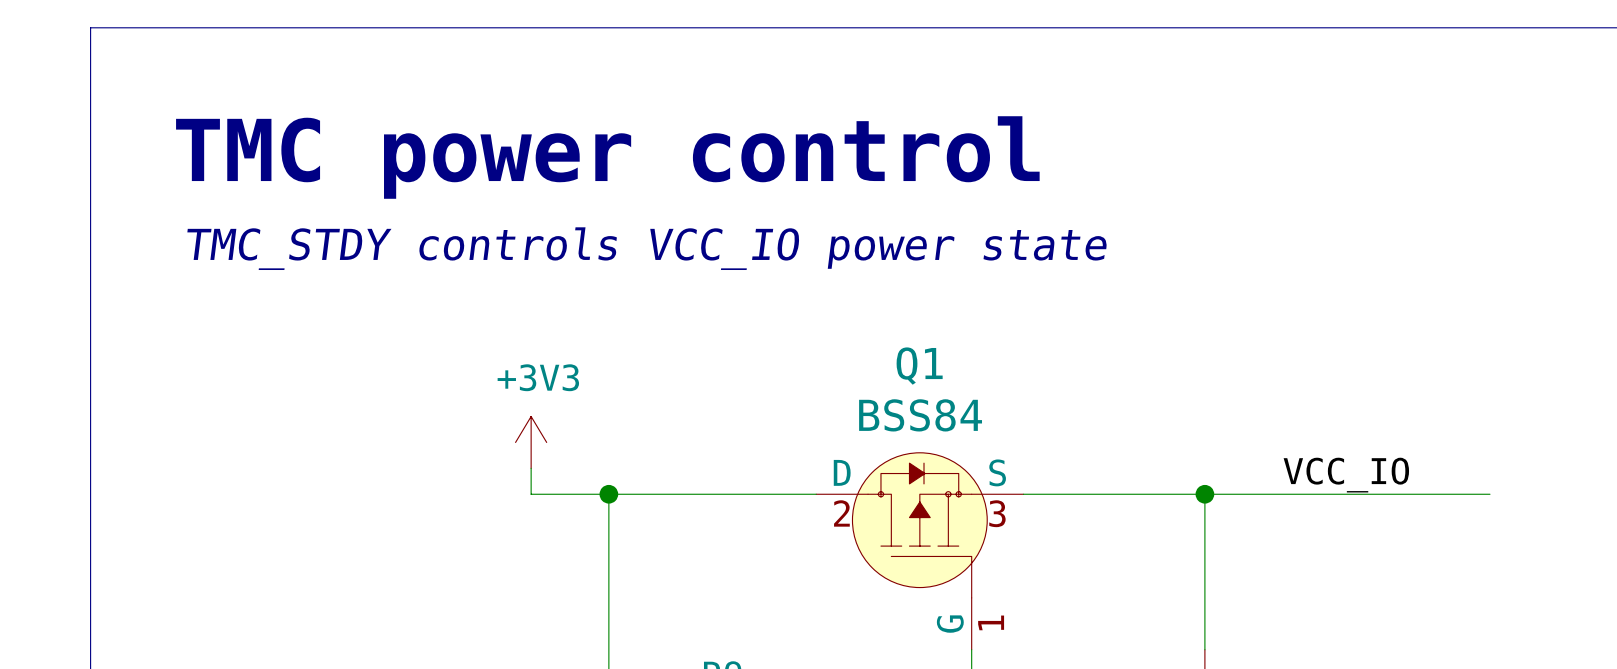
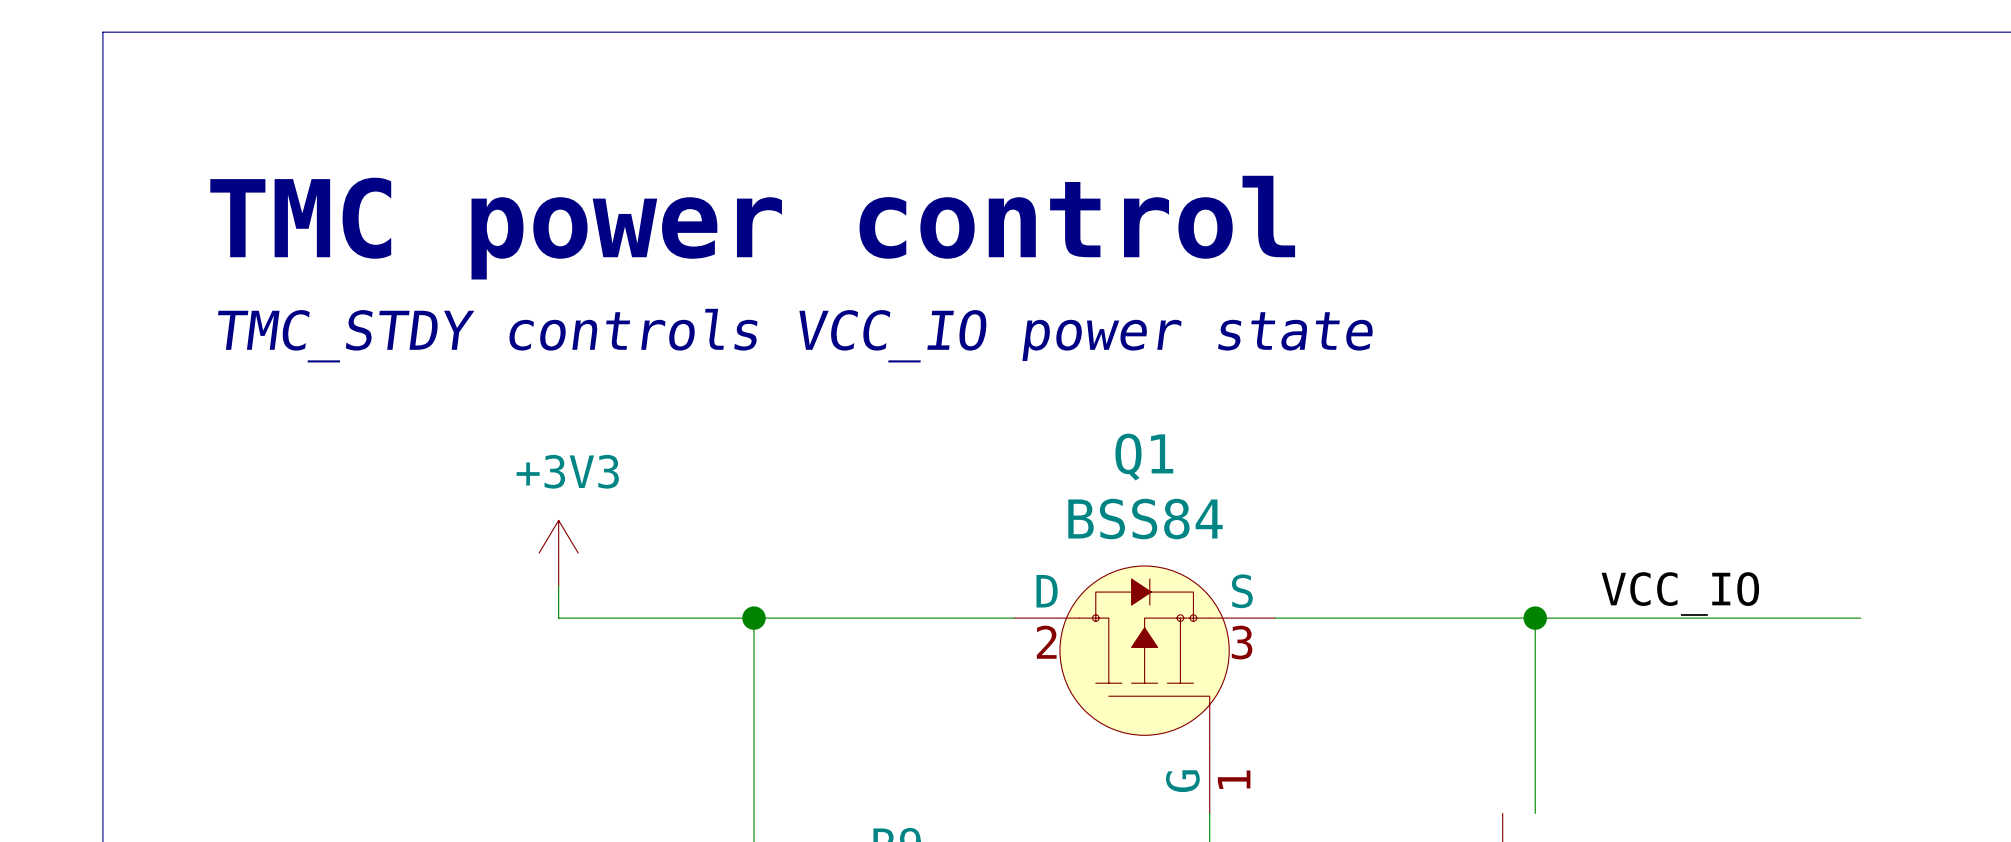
text position: TMC power control (607, 157) -> TMC power control (752, 227)
text position: TMC_STDY controls VCC_IO power state (647, 248) -> TMC_STDY controls VCC_IO power state (795, 335)
power symbol position: +3V3 (531, 442) -> +3V3 (558, 553)
wire: (531, 468) (531, 494) -> (558, 585) (558, 618) (656, 618)
wire: (1204, 494) (1204, 649) -> (1535, 618) (1535, 813)
junction position: (1204, 494) -> (1535, 618)

